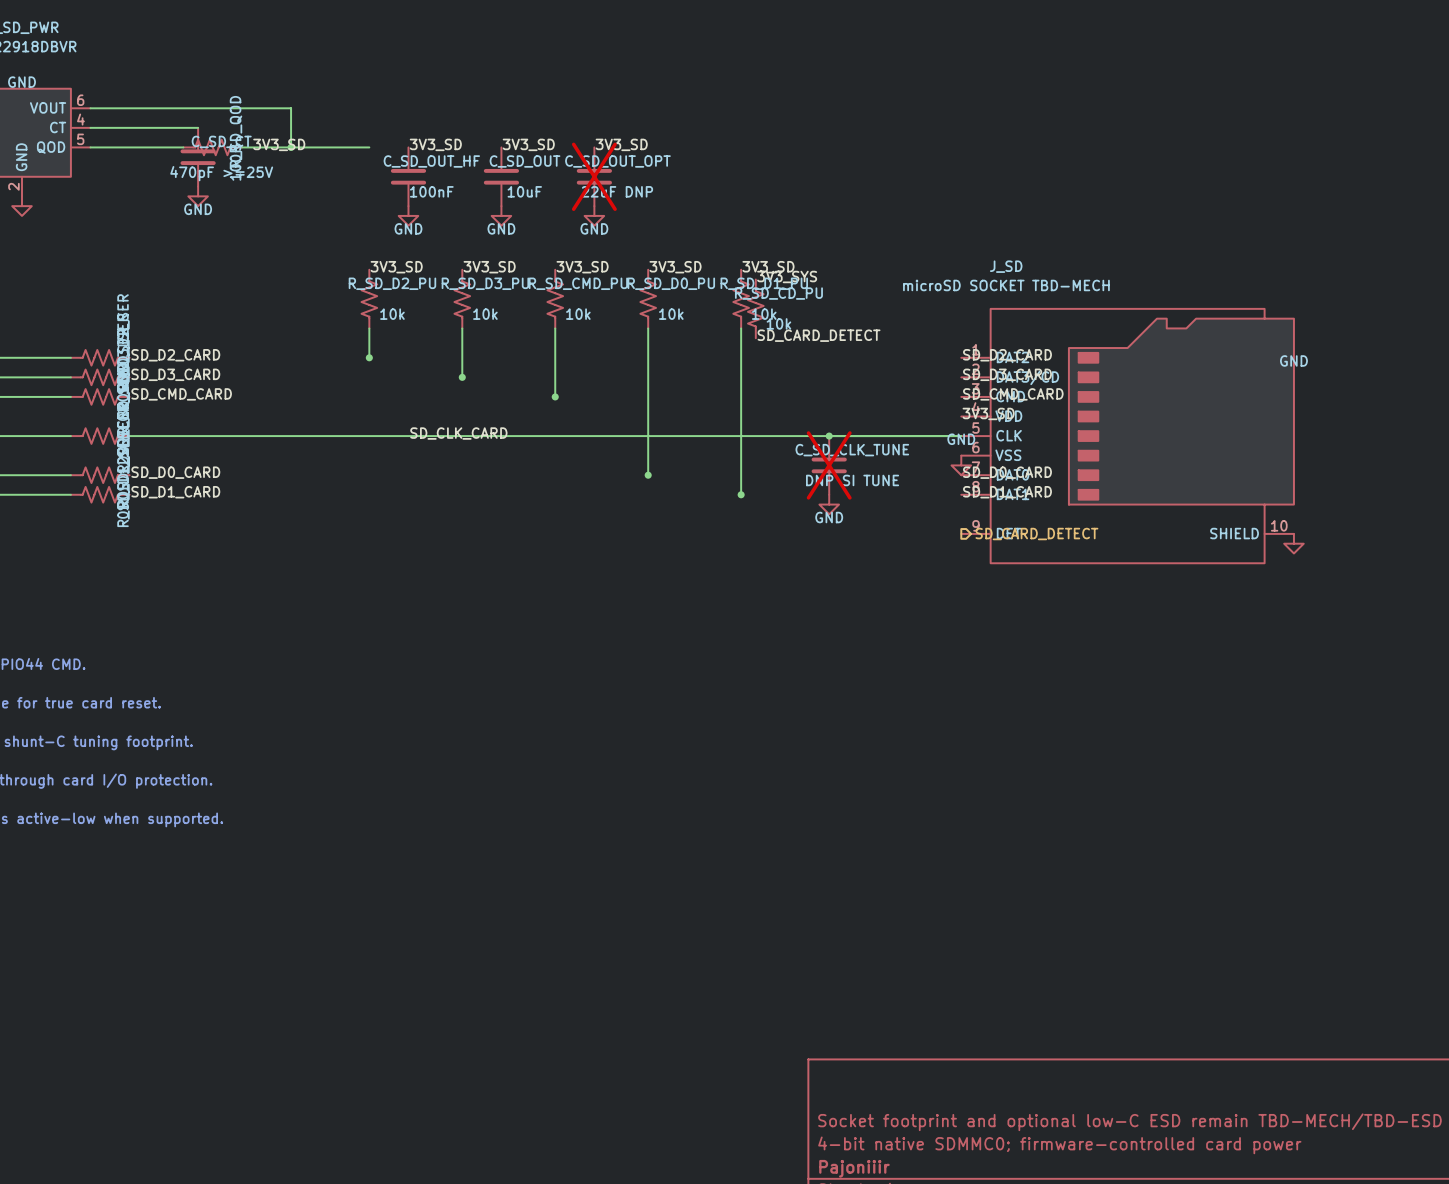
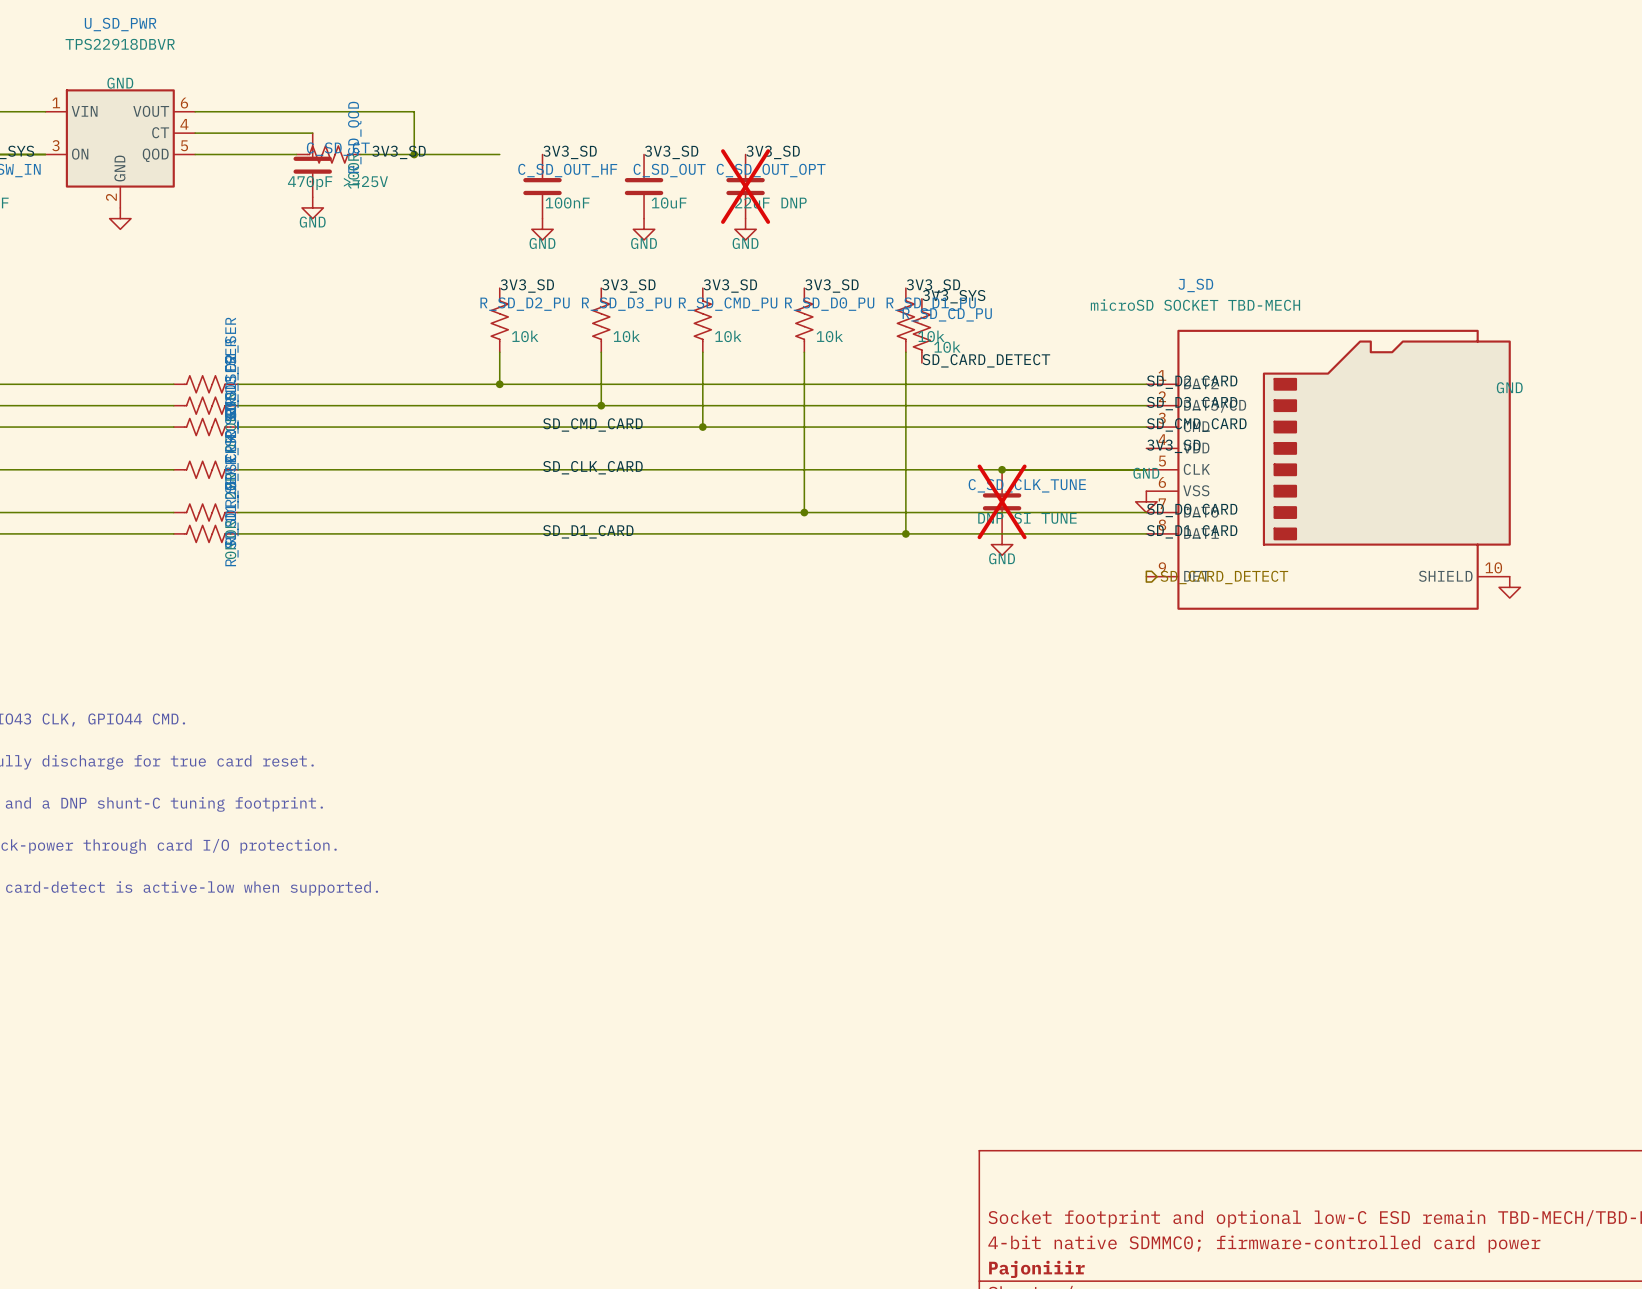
label: SD_D2_CARD (175, 355) -> none
wire: none -> (237, 384) (1146, 384)
label: SD_D3_CARD (175, 374) -> none
wire: none -> (237, 405) (1146, 405)
label: SD_CMD_CARD (181, 394) -> none
label: none -> SD_CMD_CARD (592, 424)
wire: none -> (237, 427) (1146, 427)
label: SD_D0_CARD (175, 472) -> none
wire: none -> (237, 512) (1146, 512)
label: SD_D1_CARD (175, 492) -> none
label: none -> SD_D1_CARD (588, 531)
wire: none -> (237, 533) (1146, 533)

